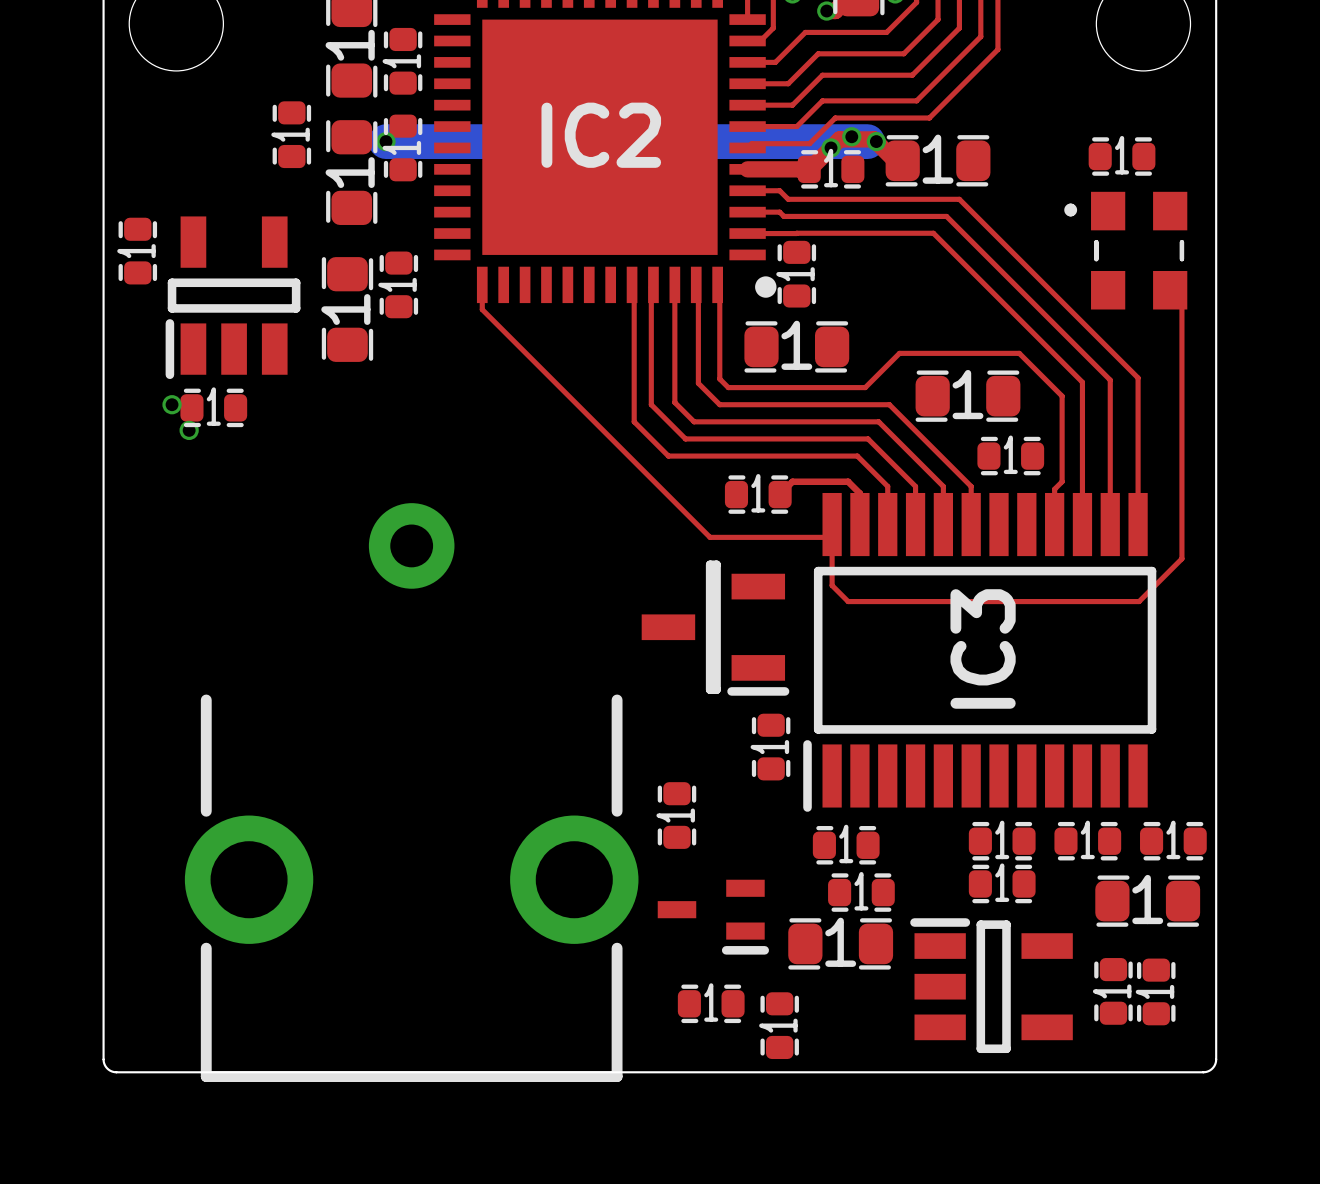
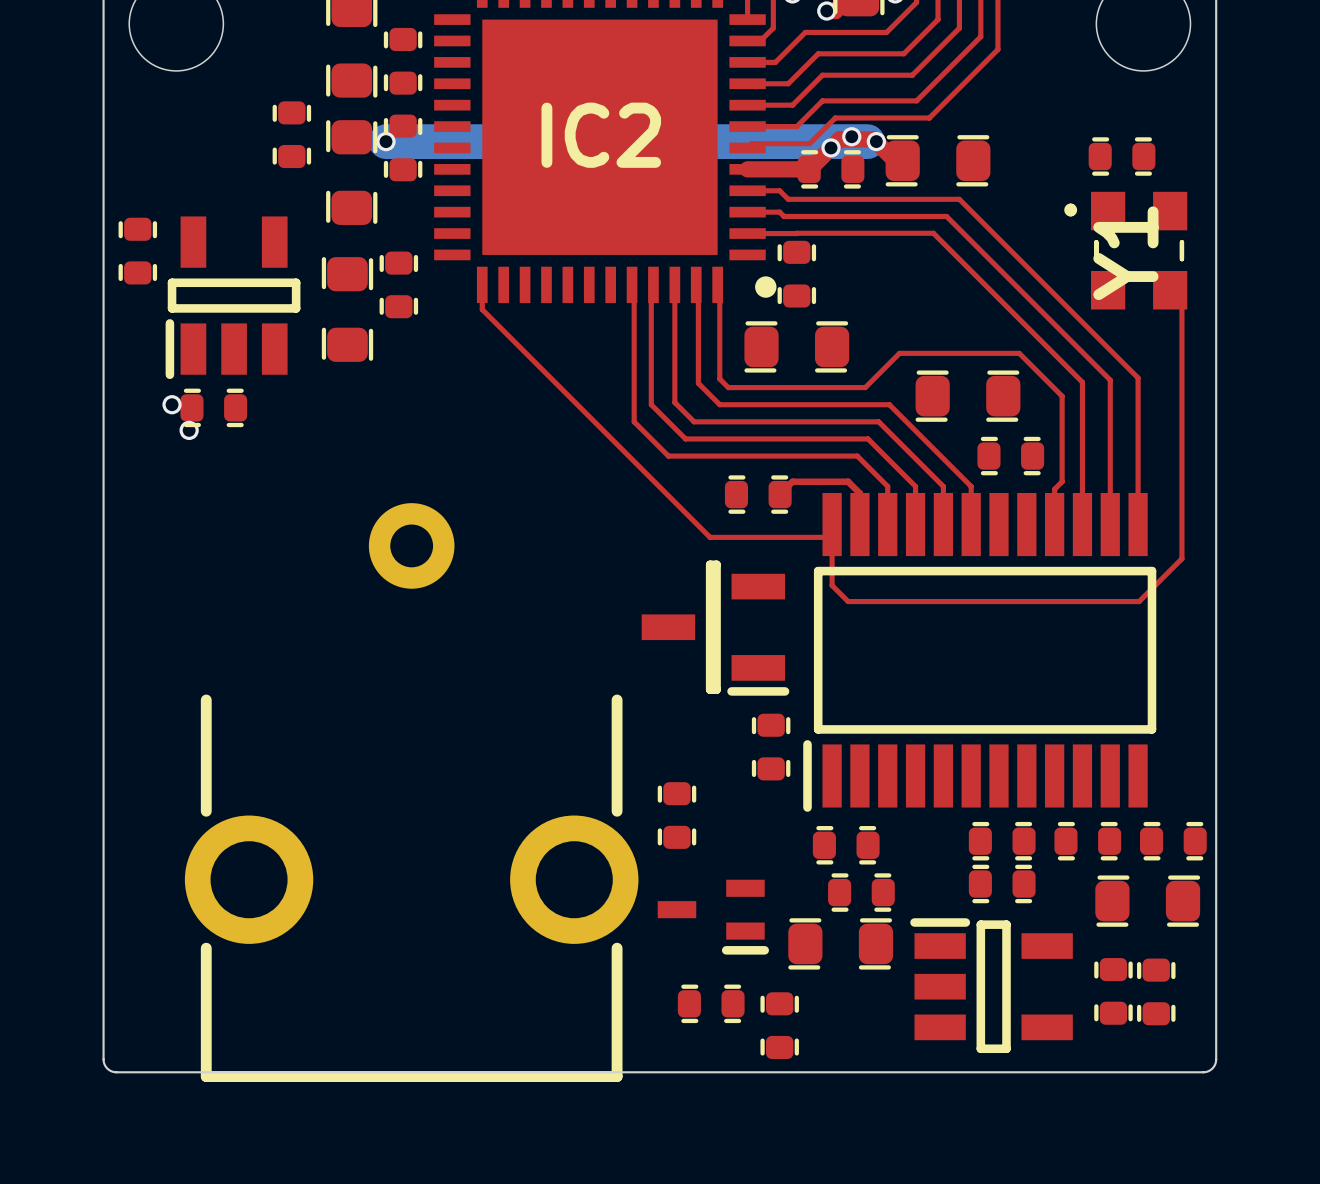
part text: 1 (350, 45) -> none
part text: 1 (401, 61) -> none
part text: 1 (290, 134) -> none
part text: 1 (401, 147) -> none
part text: 1 (1122, 155) -> none
part text: 1 (938, 159) -> none
part text: 1 (831, 168) -> none
part text: 1 (350, 172) -> none
part text: 1 (136, 251) -> none
Y1 name: none -> Y1 (1125, 253)
part text: 1 (795, 274) -> none
part text: 1 (397, 284) -> none
part text: 1 (345, 309) -> none
part text: 1 (796, 345) -> none
part text: 1 (967, 394) -> none
part text: 1 (213, 406) -> none
part text: 1 (1010, 454) -> none
part text: 1 (758, 493) -> none
IC3 name: IC3 (983, 648) -> none
part text: 1 (769, 747) -> none
part text: 1 (675, 815) -> none
part text: 1 (1002, 839) -> none
part text: 1 (1087, 839) -> none
part text: 1 (1173, 839) -> none
part text: 1 (846, 843) -> none
part text: 1 (1002, 882) -> none
part text: 1 (861, 891) -> none
part text: 1 (1147, 899) -> none
part text: 1 (840, 942) -> none
part text: 1 (1112, 991) -> none
part text: 1 (1154, 991) -> none
part text: 1 (711, 1002) -> none
part text: 1 (778, 1025) -> none

